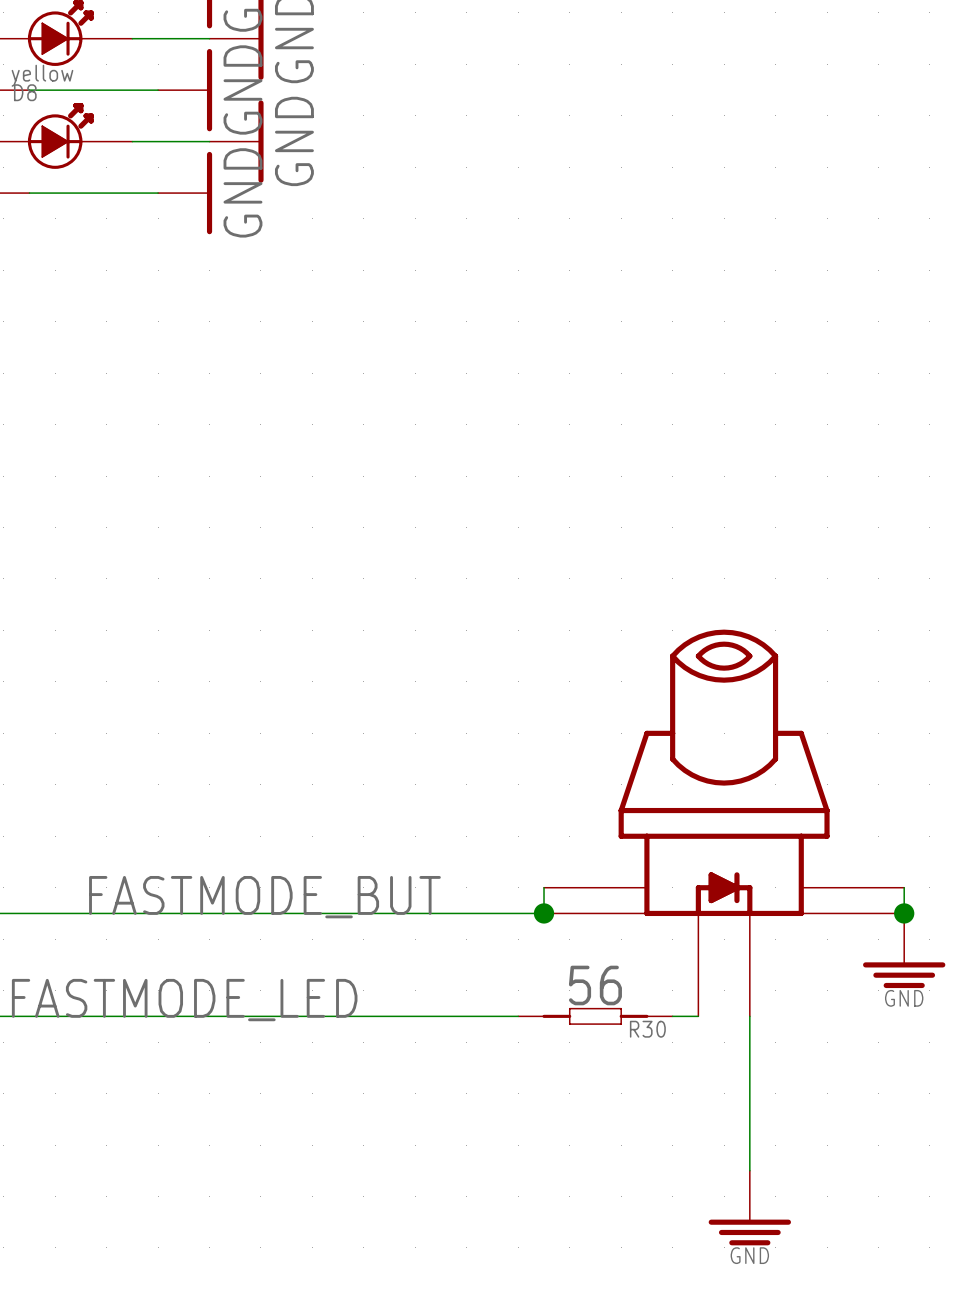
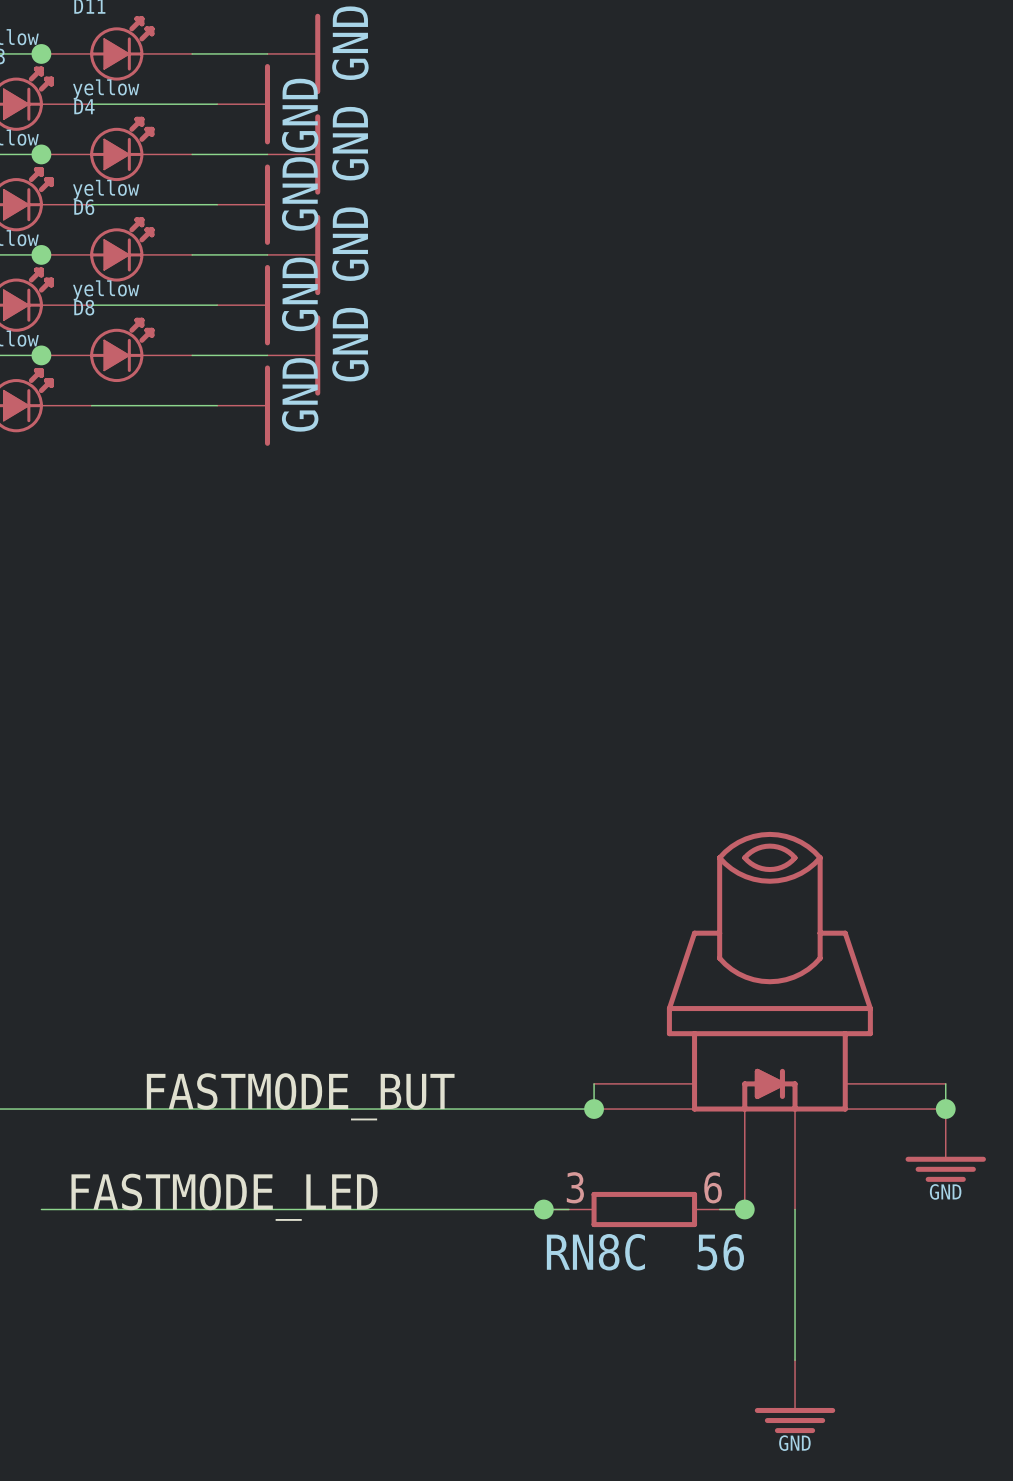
junction: none -> (543, 1209)
R30: 56 (595, 1016) -> none
RN8C: none -> 56 (644, 1209)
junction: none -> (744, 1209)

